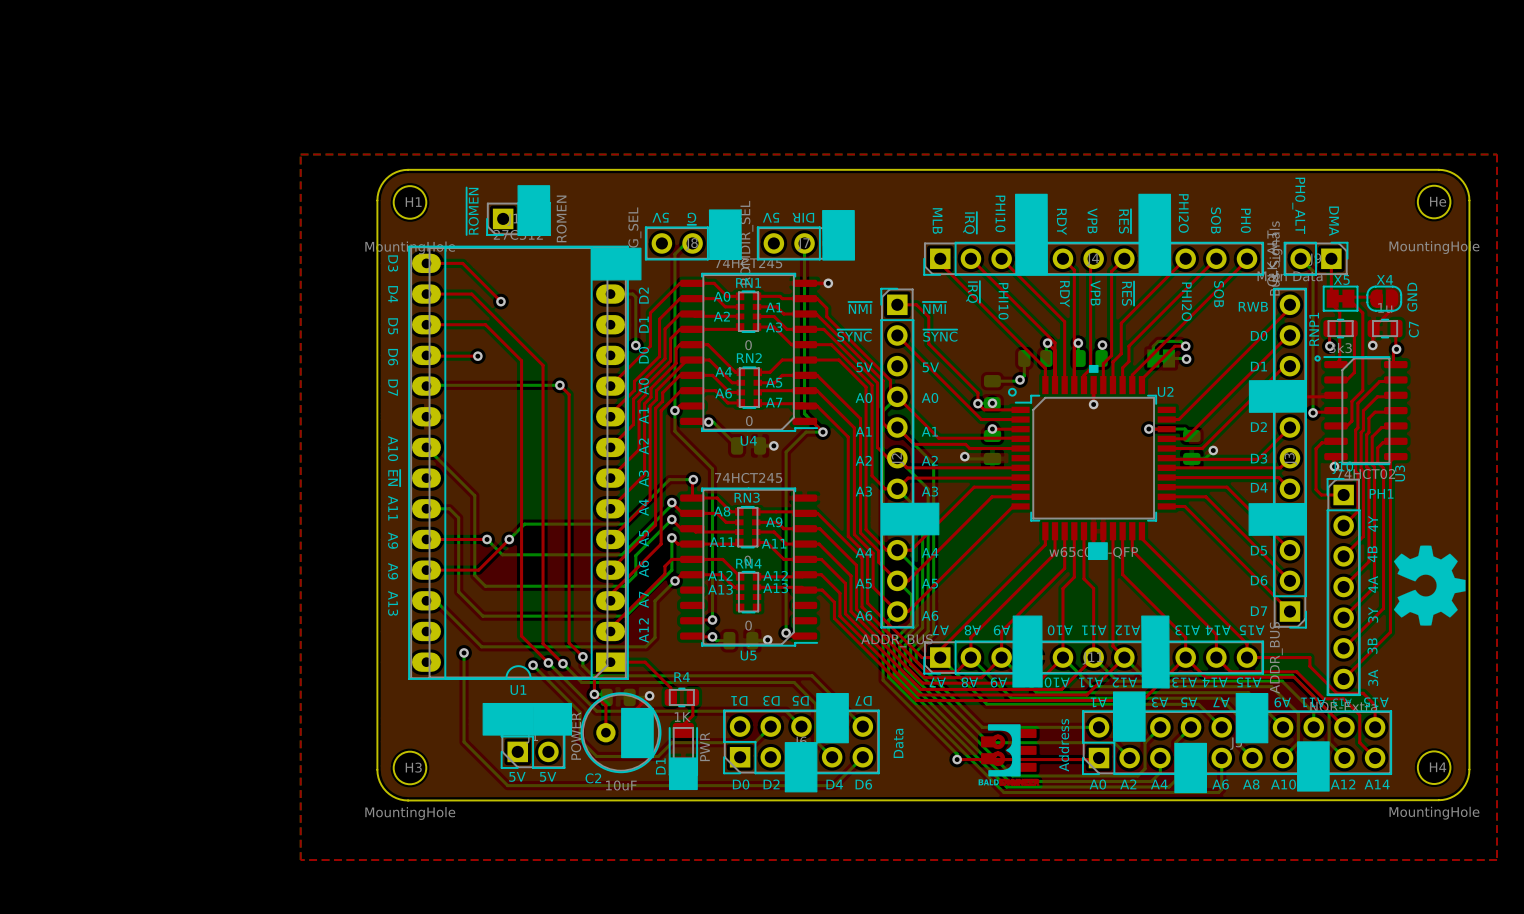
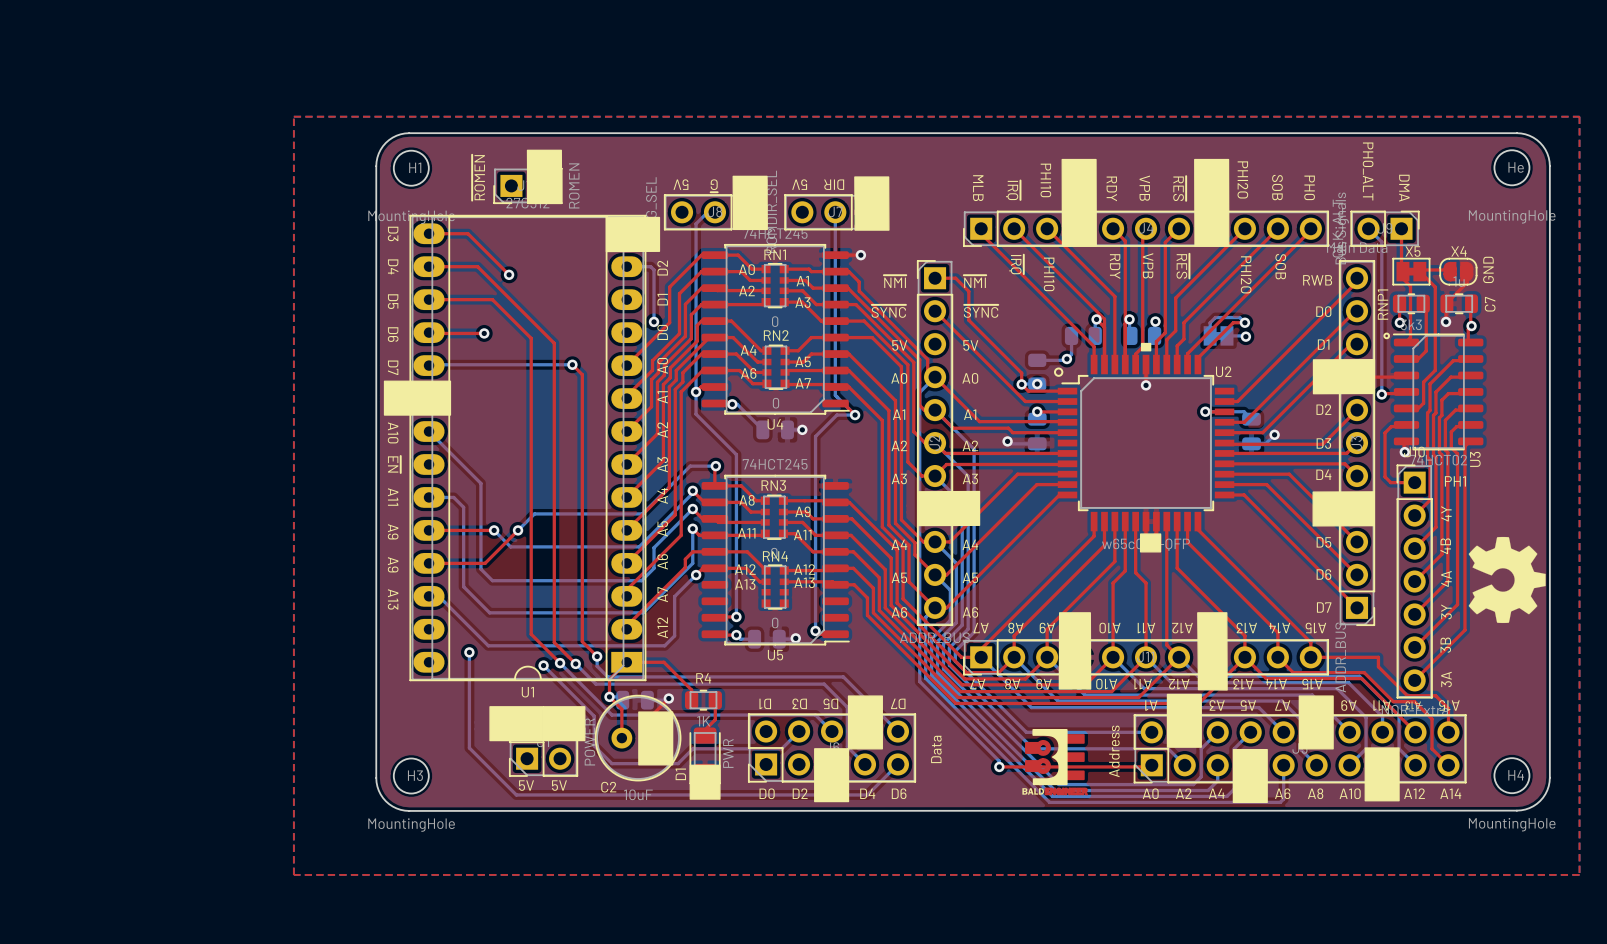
drawing: none -> [383, 380, 452, 416]

